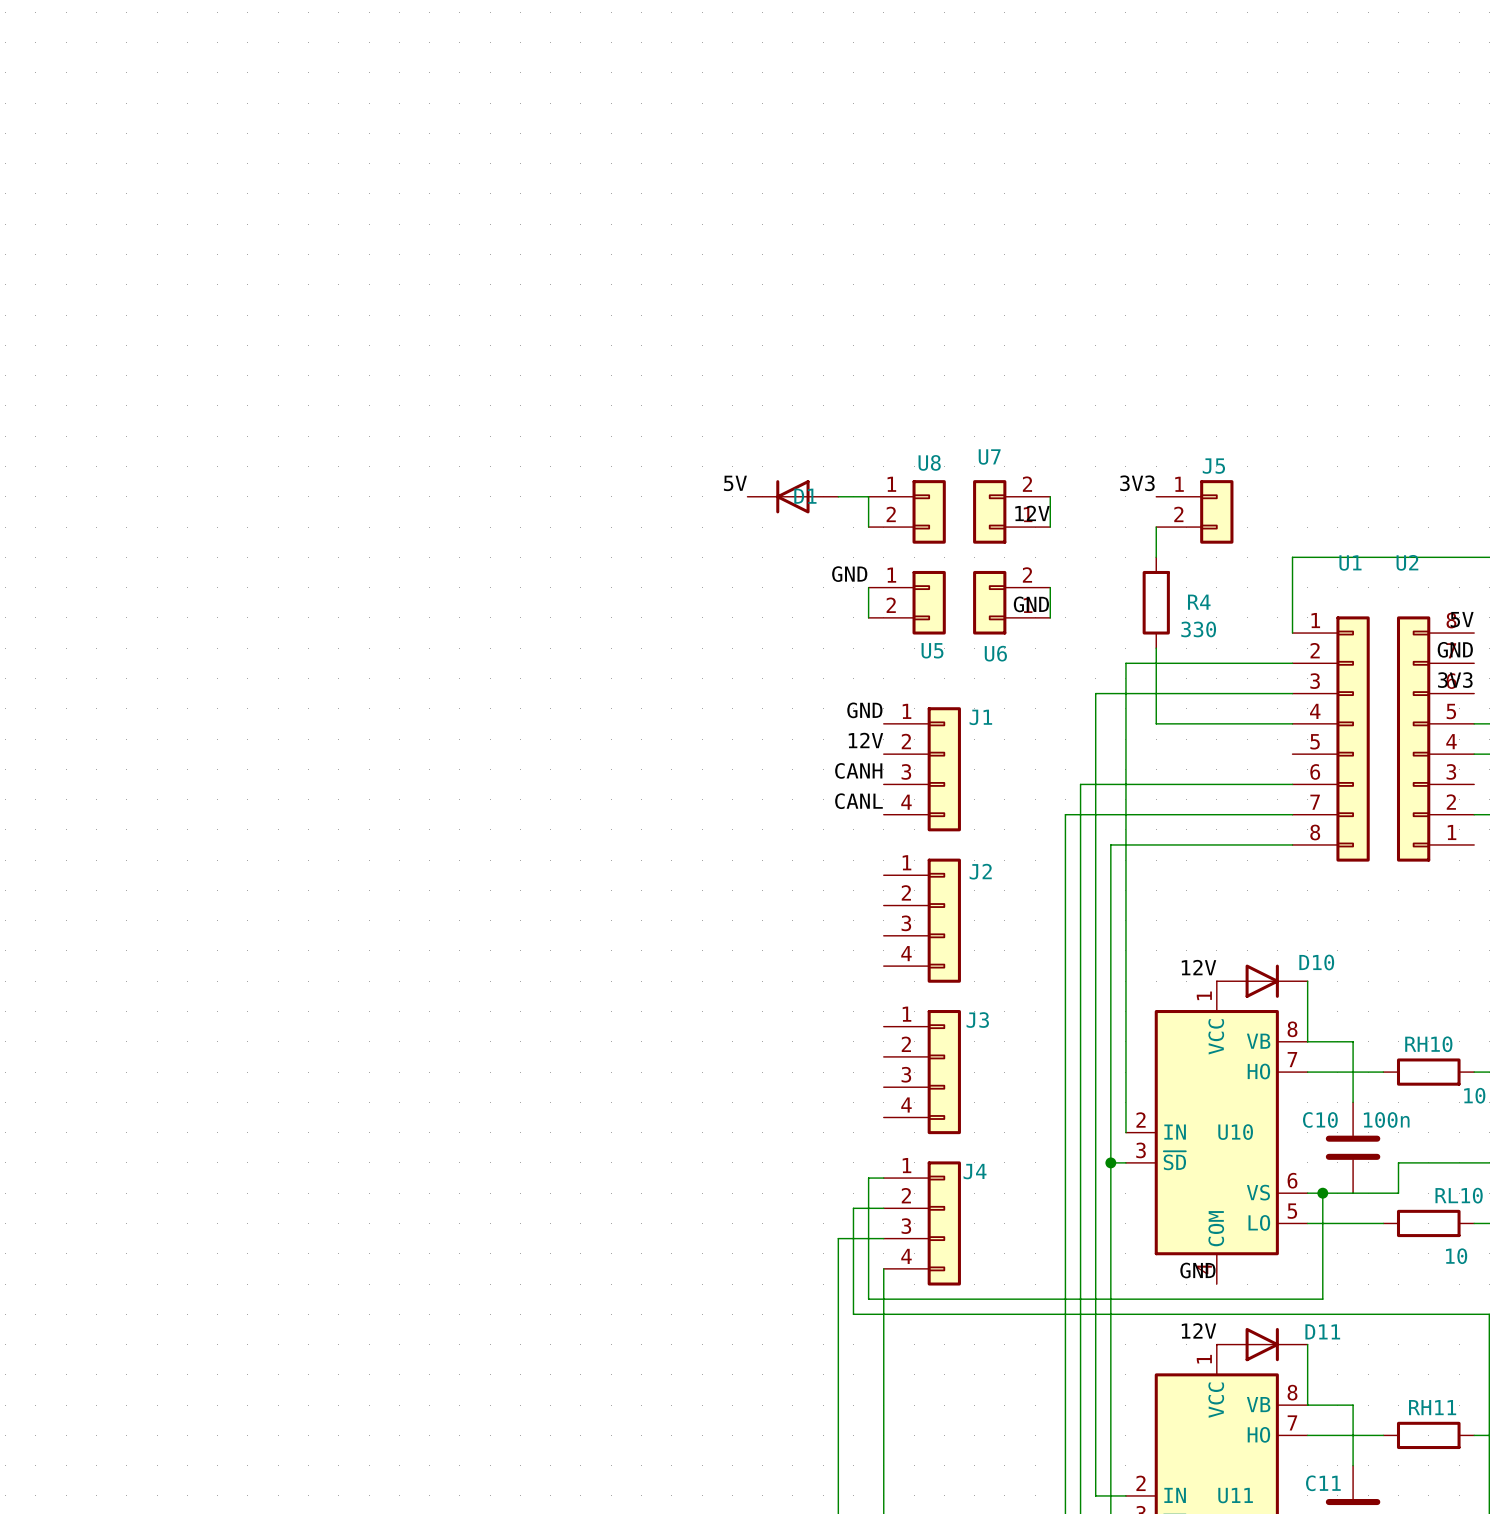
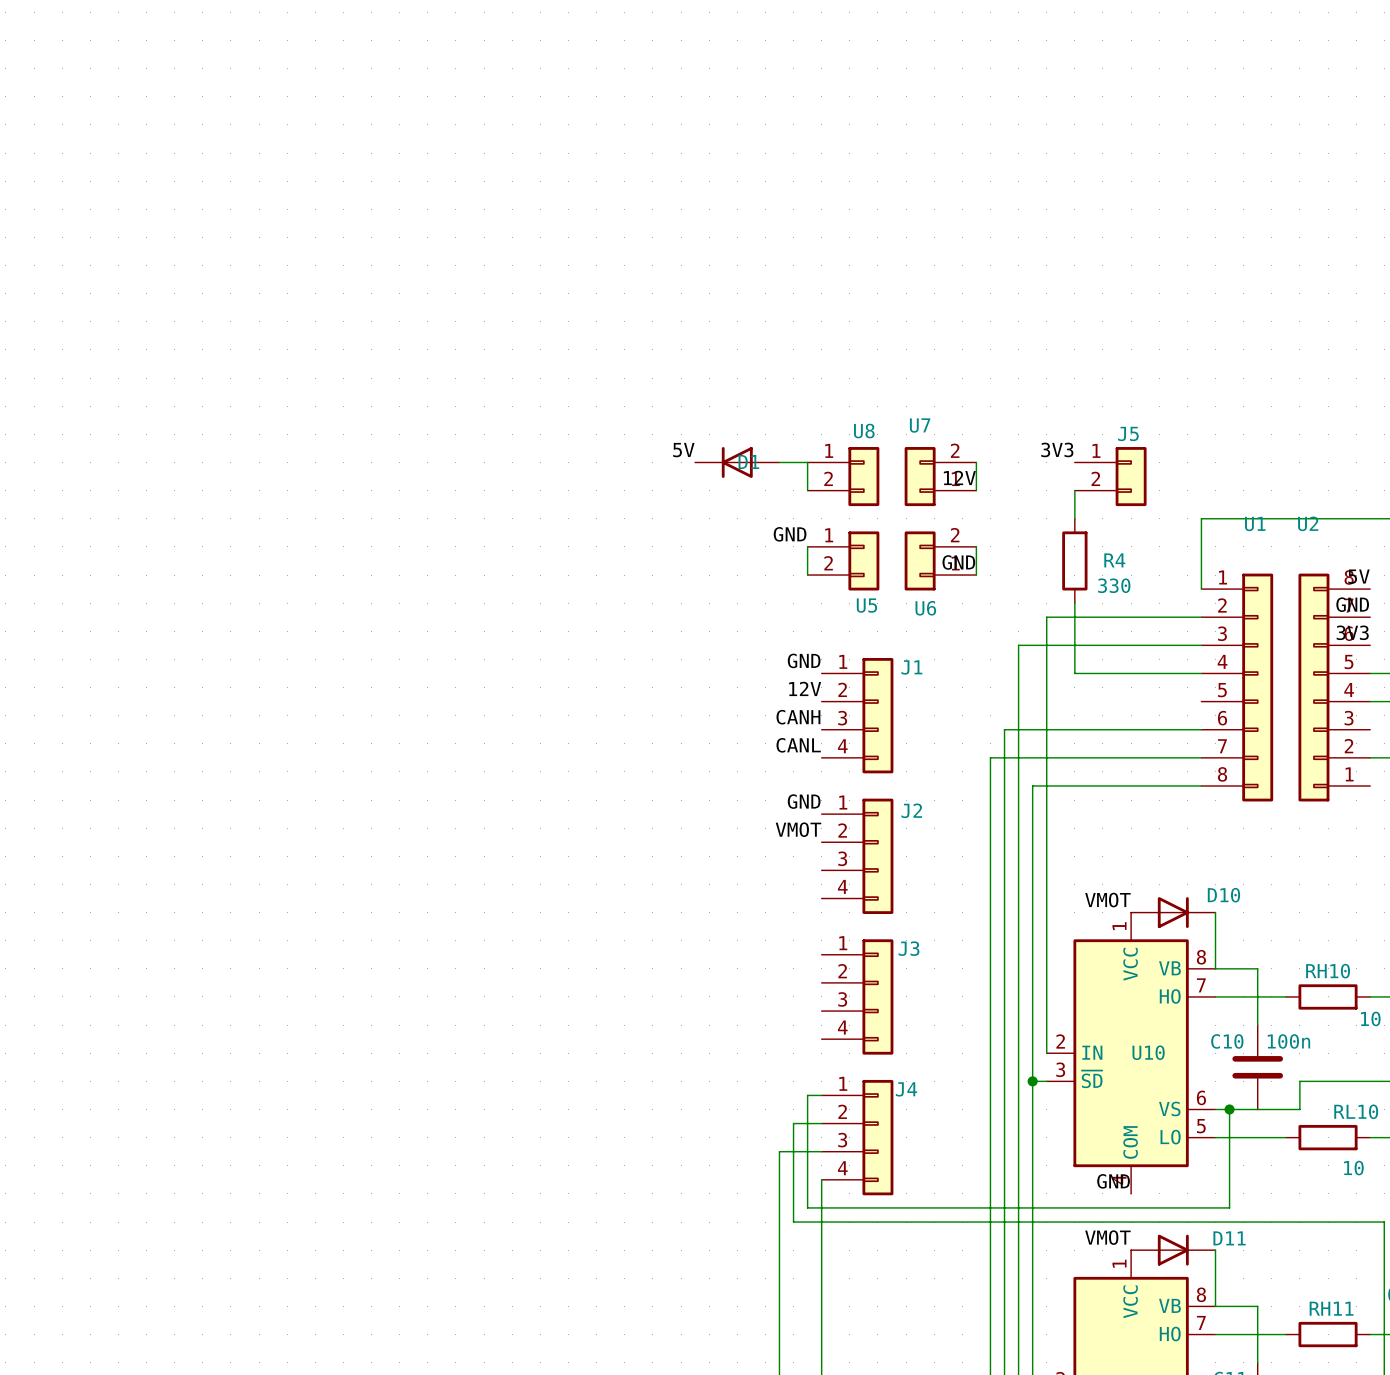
label: none -> GND (804, 801)
label: none -> VMOT (798, 829)
label: 12V (1199, 967) -> VMOT (1107, 900)
label: 12V (1199, 1330) -> VMOT (1107, 1237)

